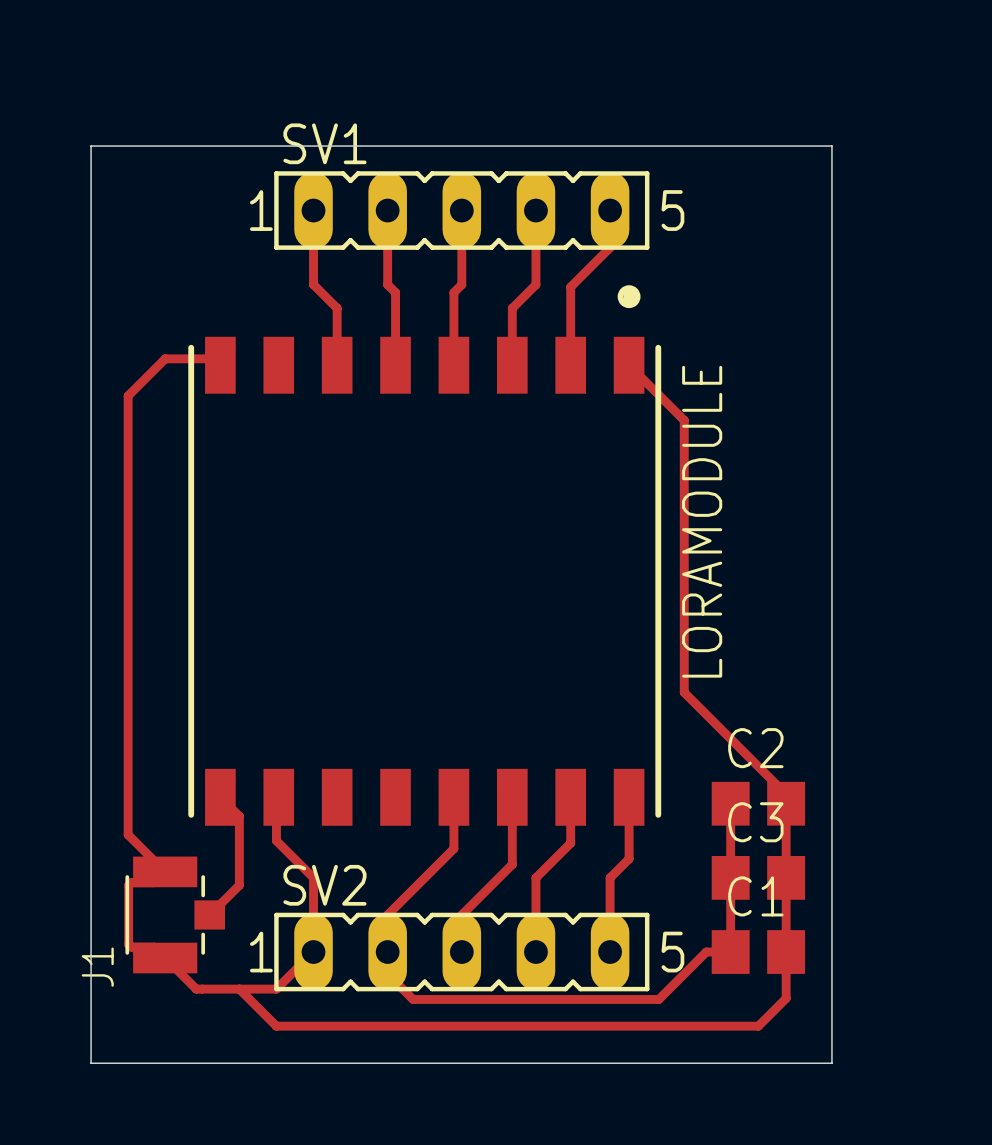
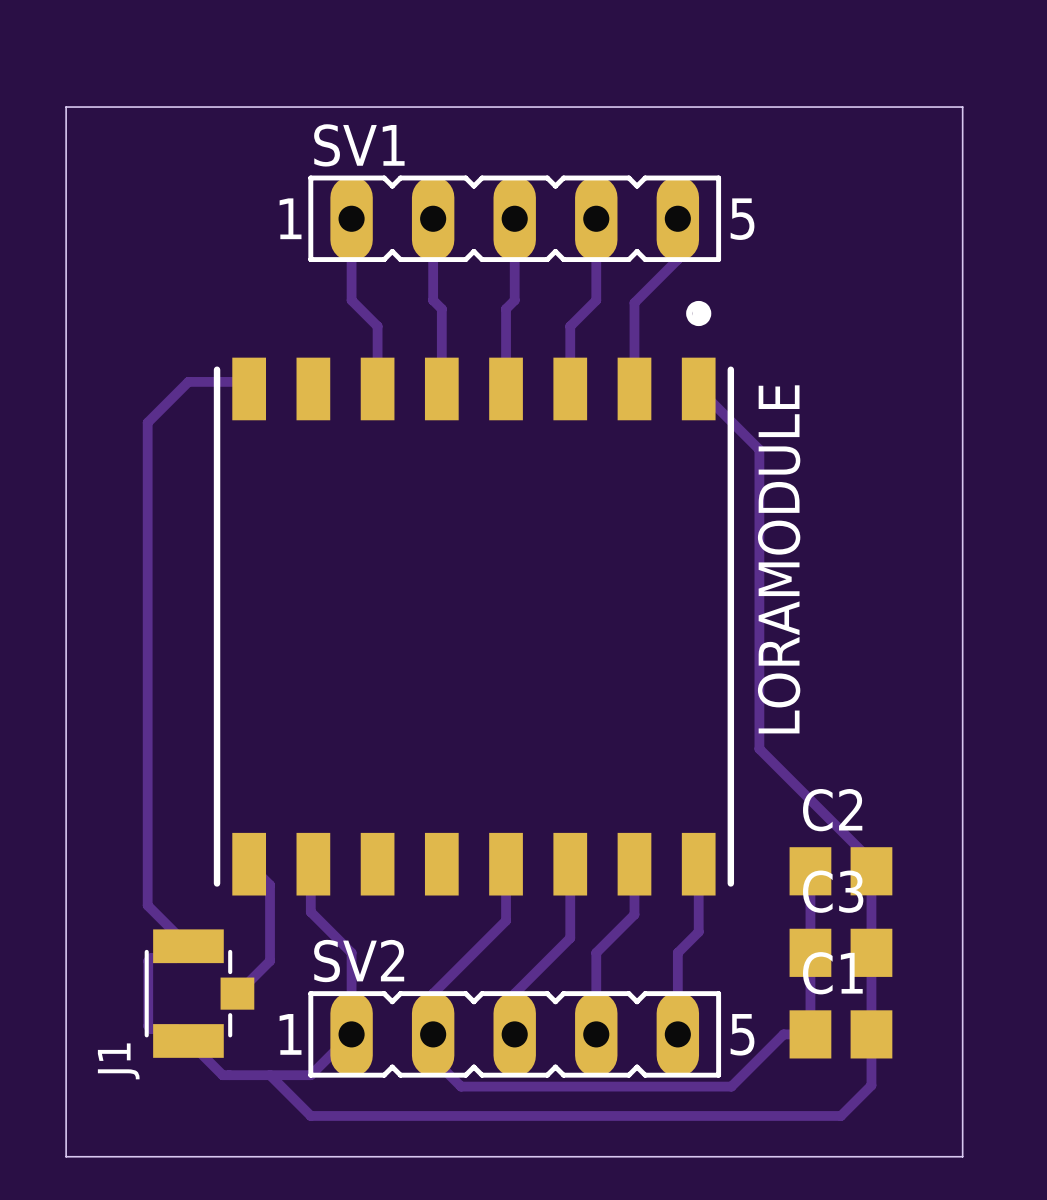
board edge: (91, 1063) (91, 146) (831, 146) (831, 1063) -> (106, 1156) (66, 1156) (66, 107) (962, 107) (962, 1156) (921, 1156)

